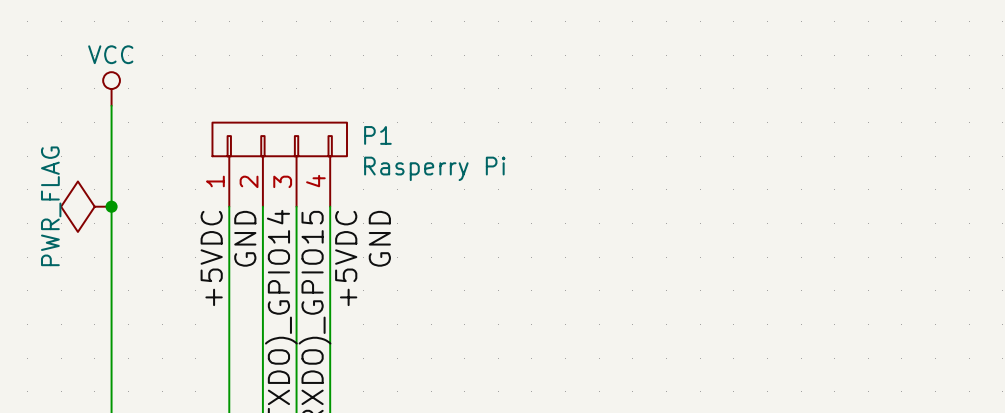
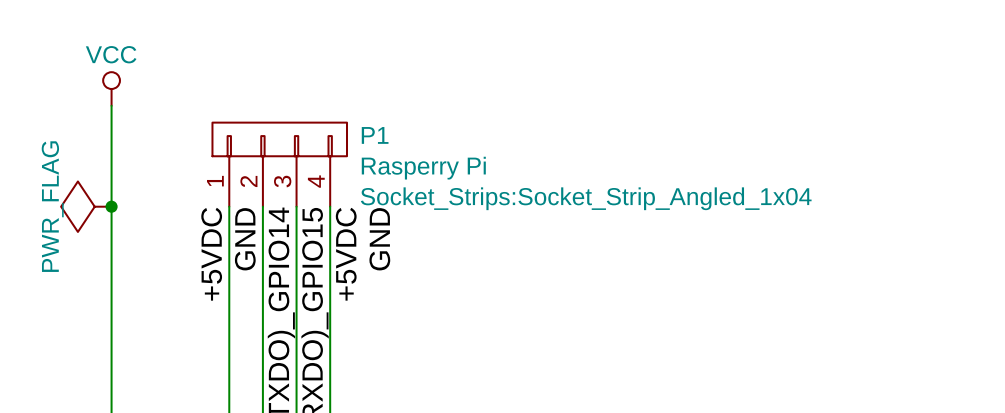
P1 text: none -> Socket_Strips:Socket_Strip_Angled_1x04 (586, 198)

